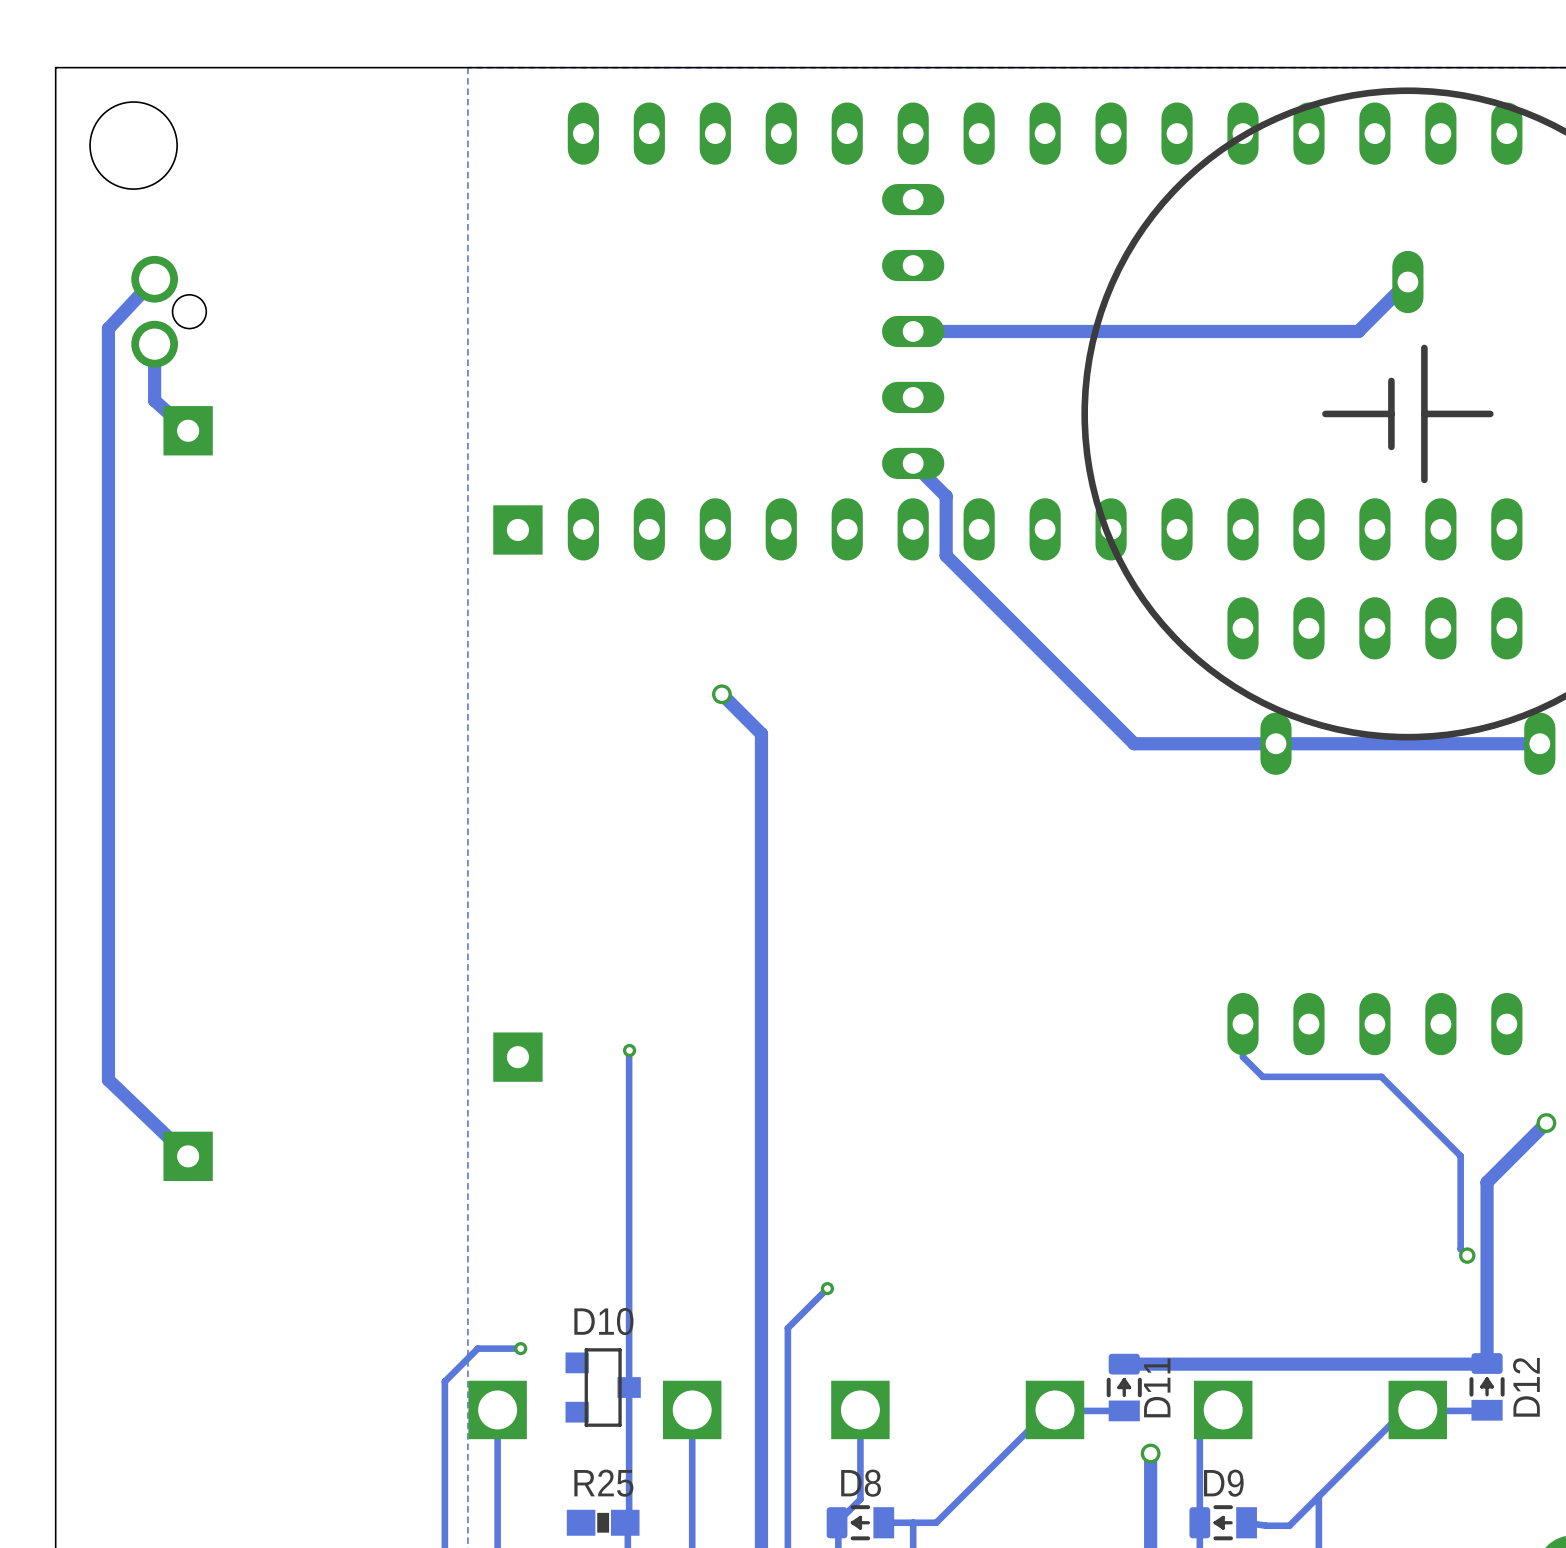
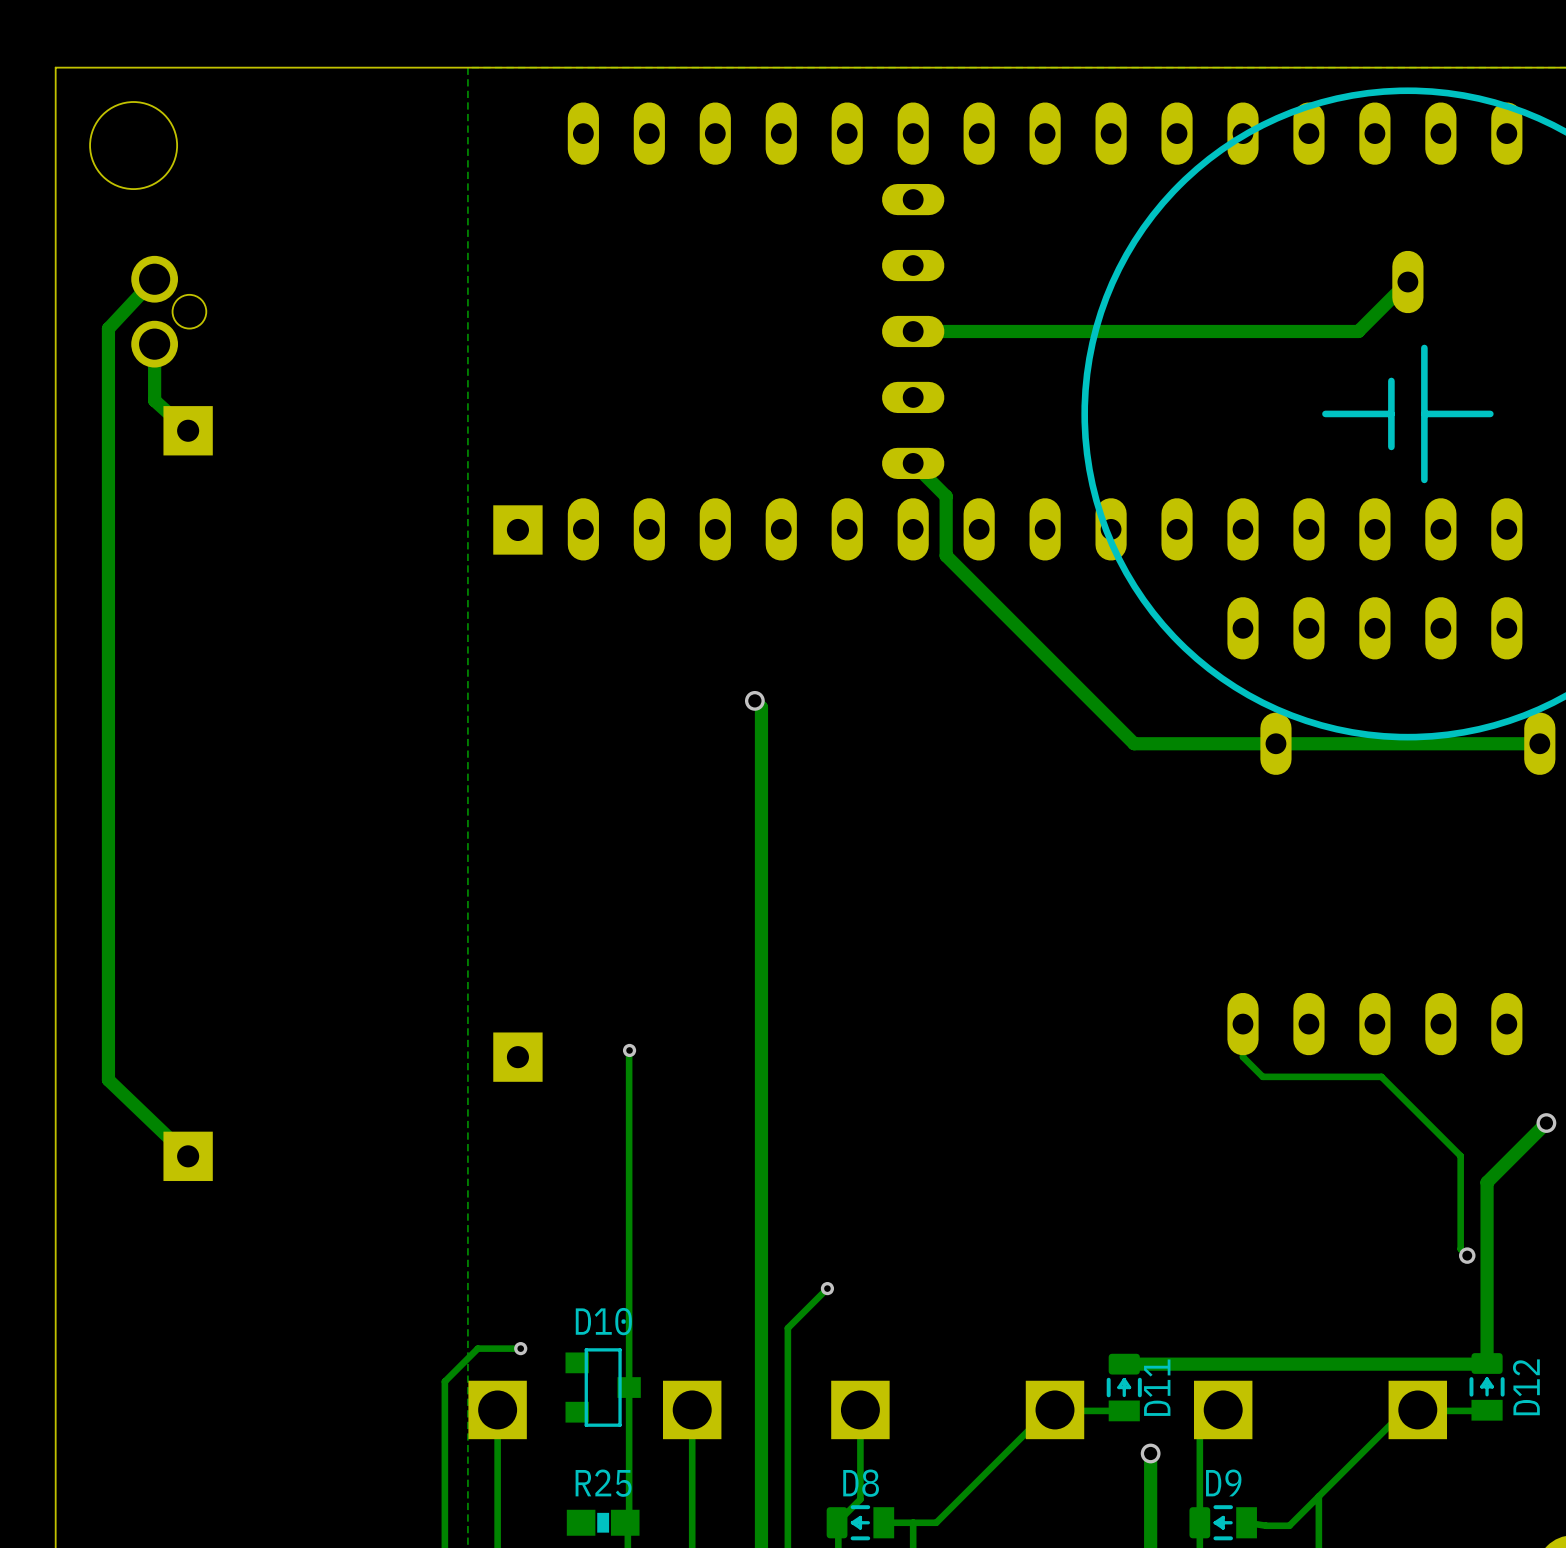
track: (721, 694) (761, 733) -> (754, 700) (761, 707) (761, 733)
via position: (721, 694) -> (754, 700)

